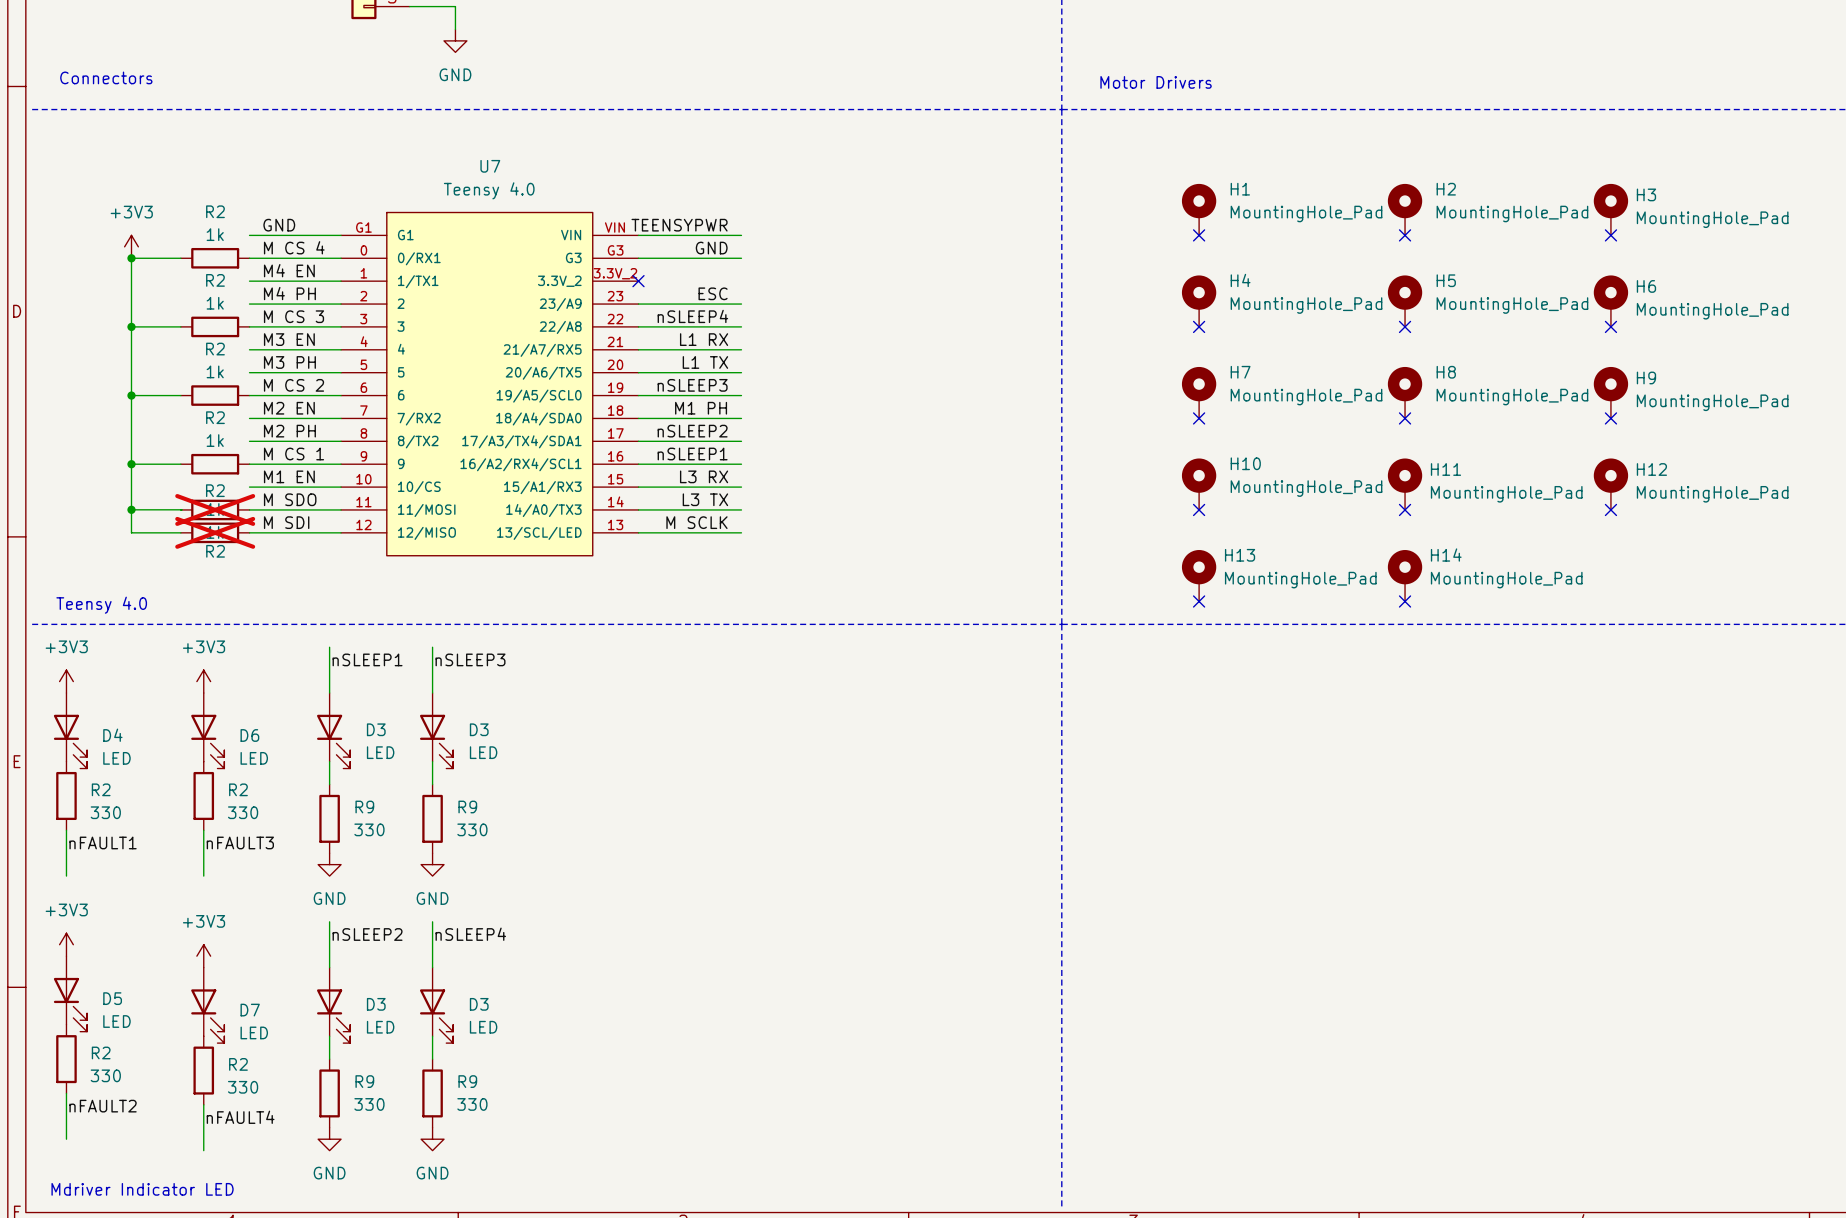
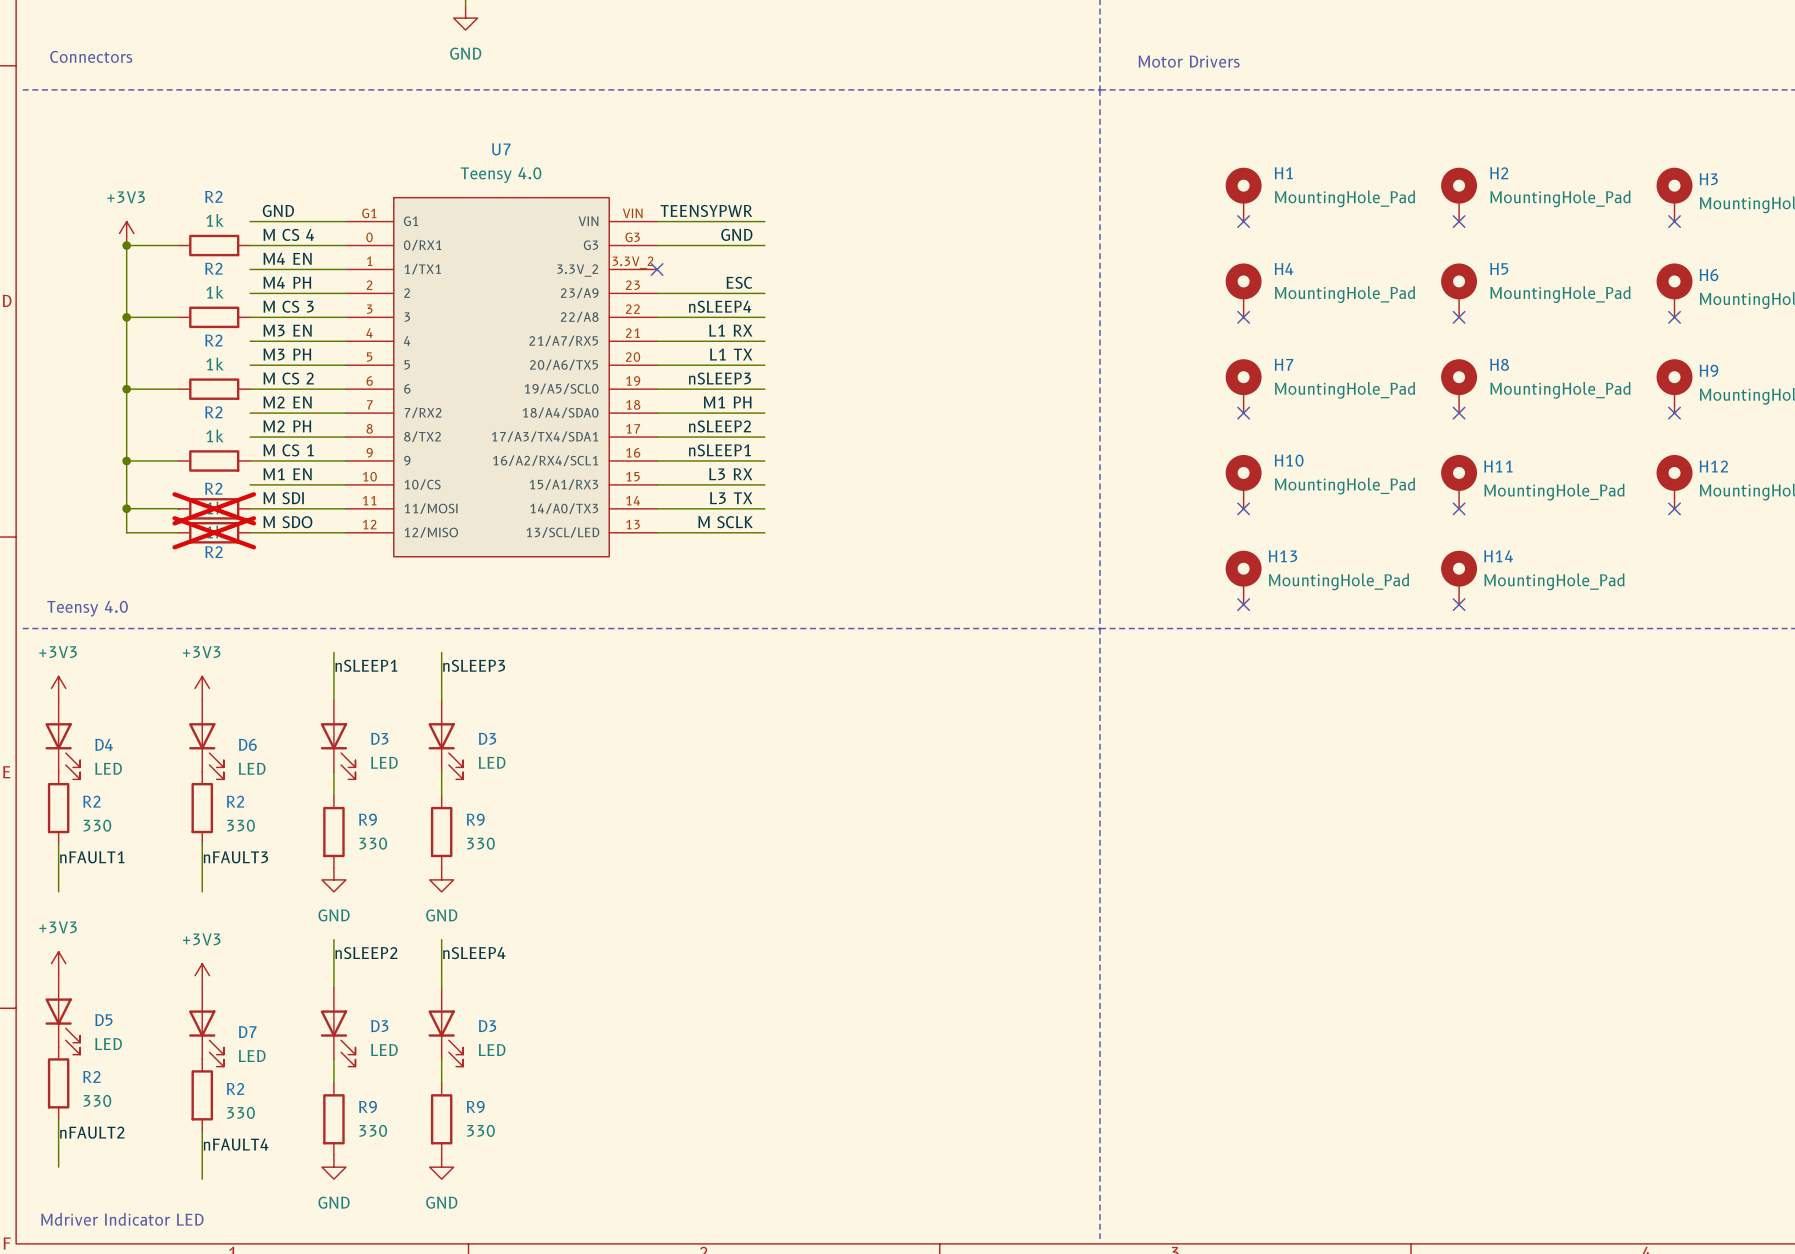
label: M SDO (290, 499) -> M SDI (283, 498)
label: M SDI (286, 522) -> M SDO (287, 522)

